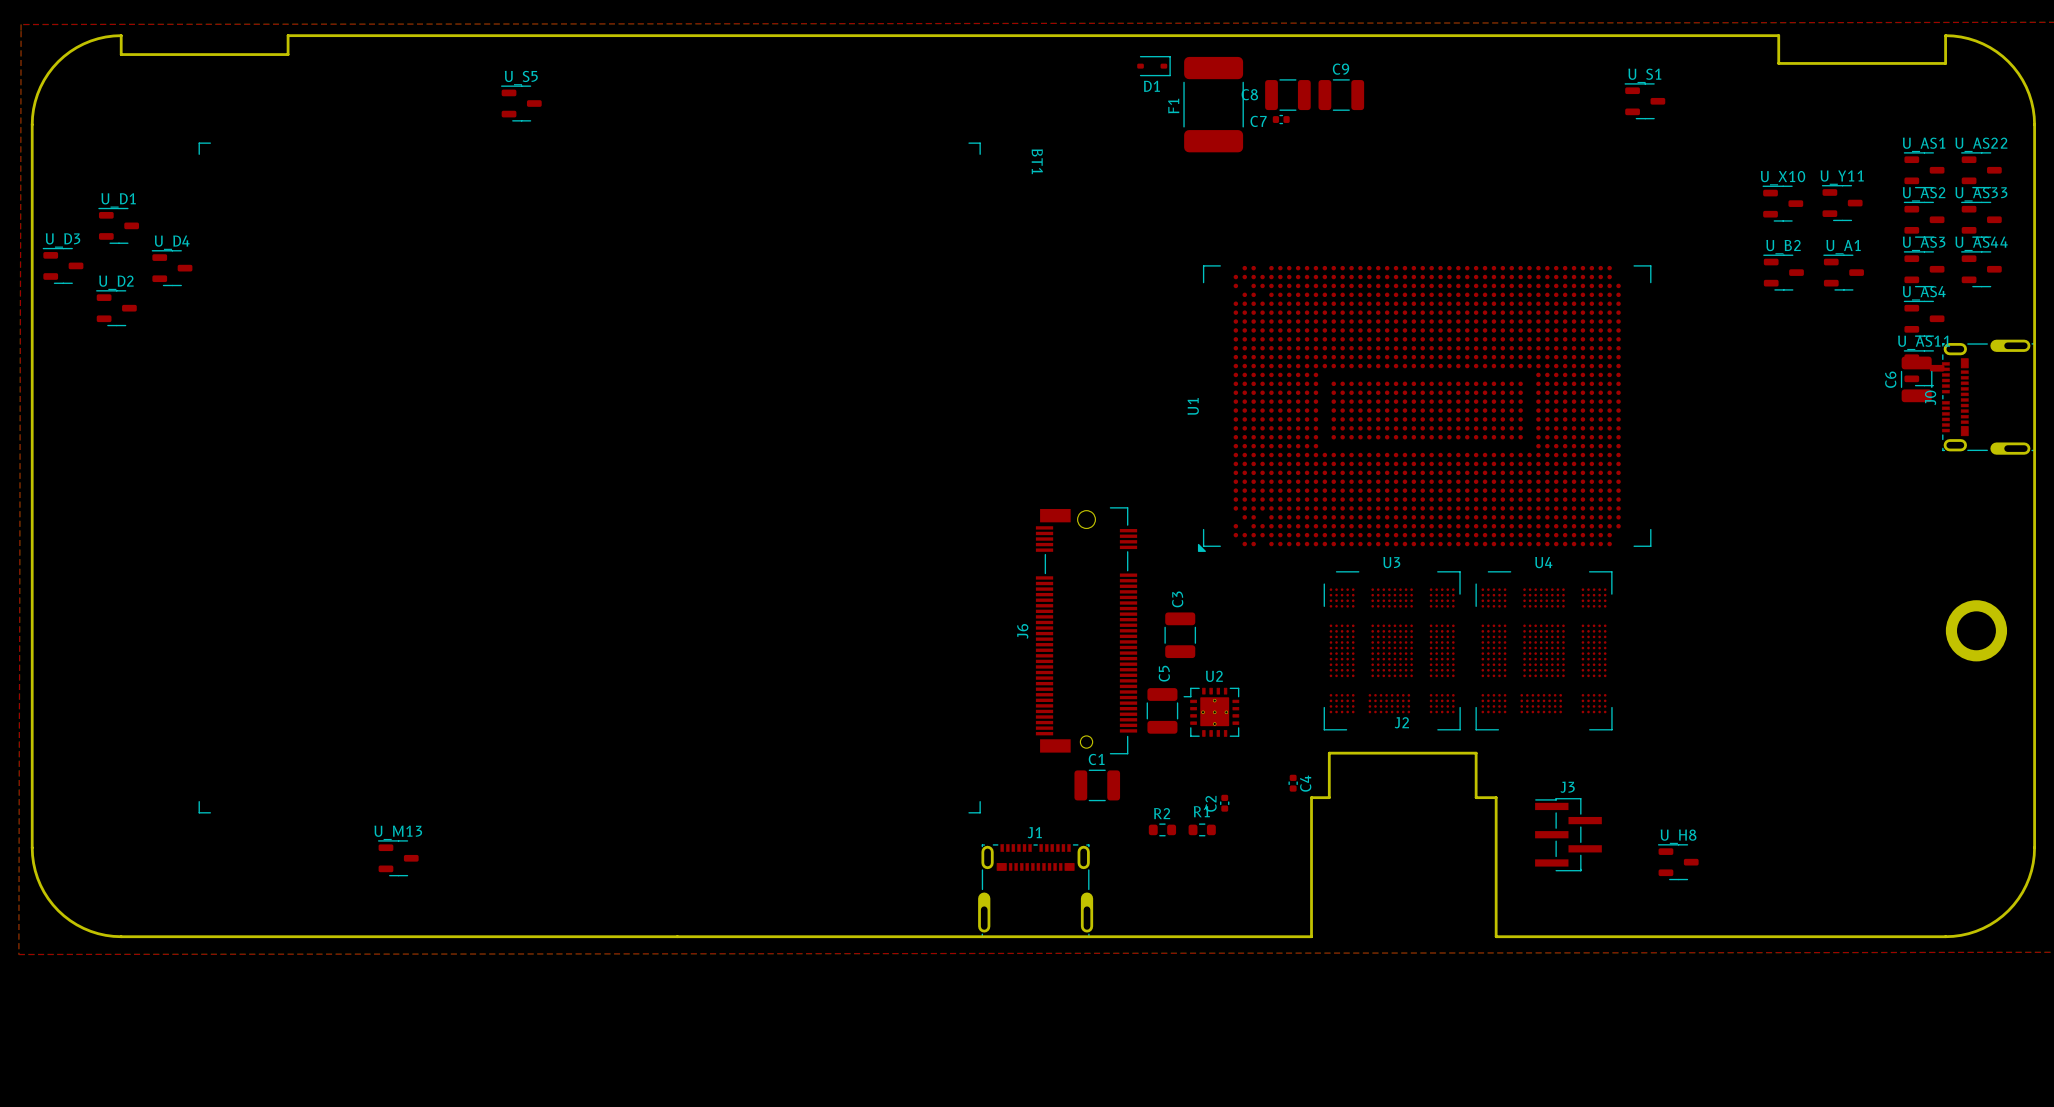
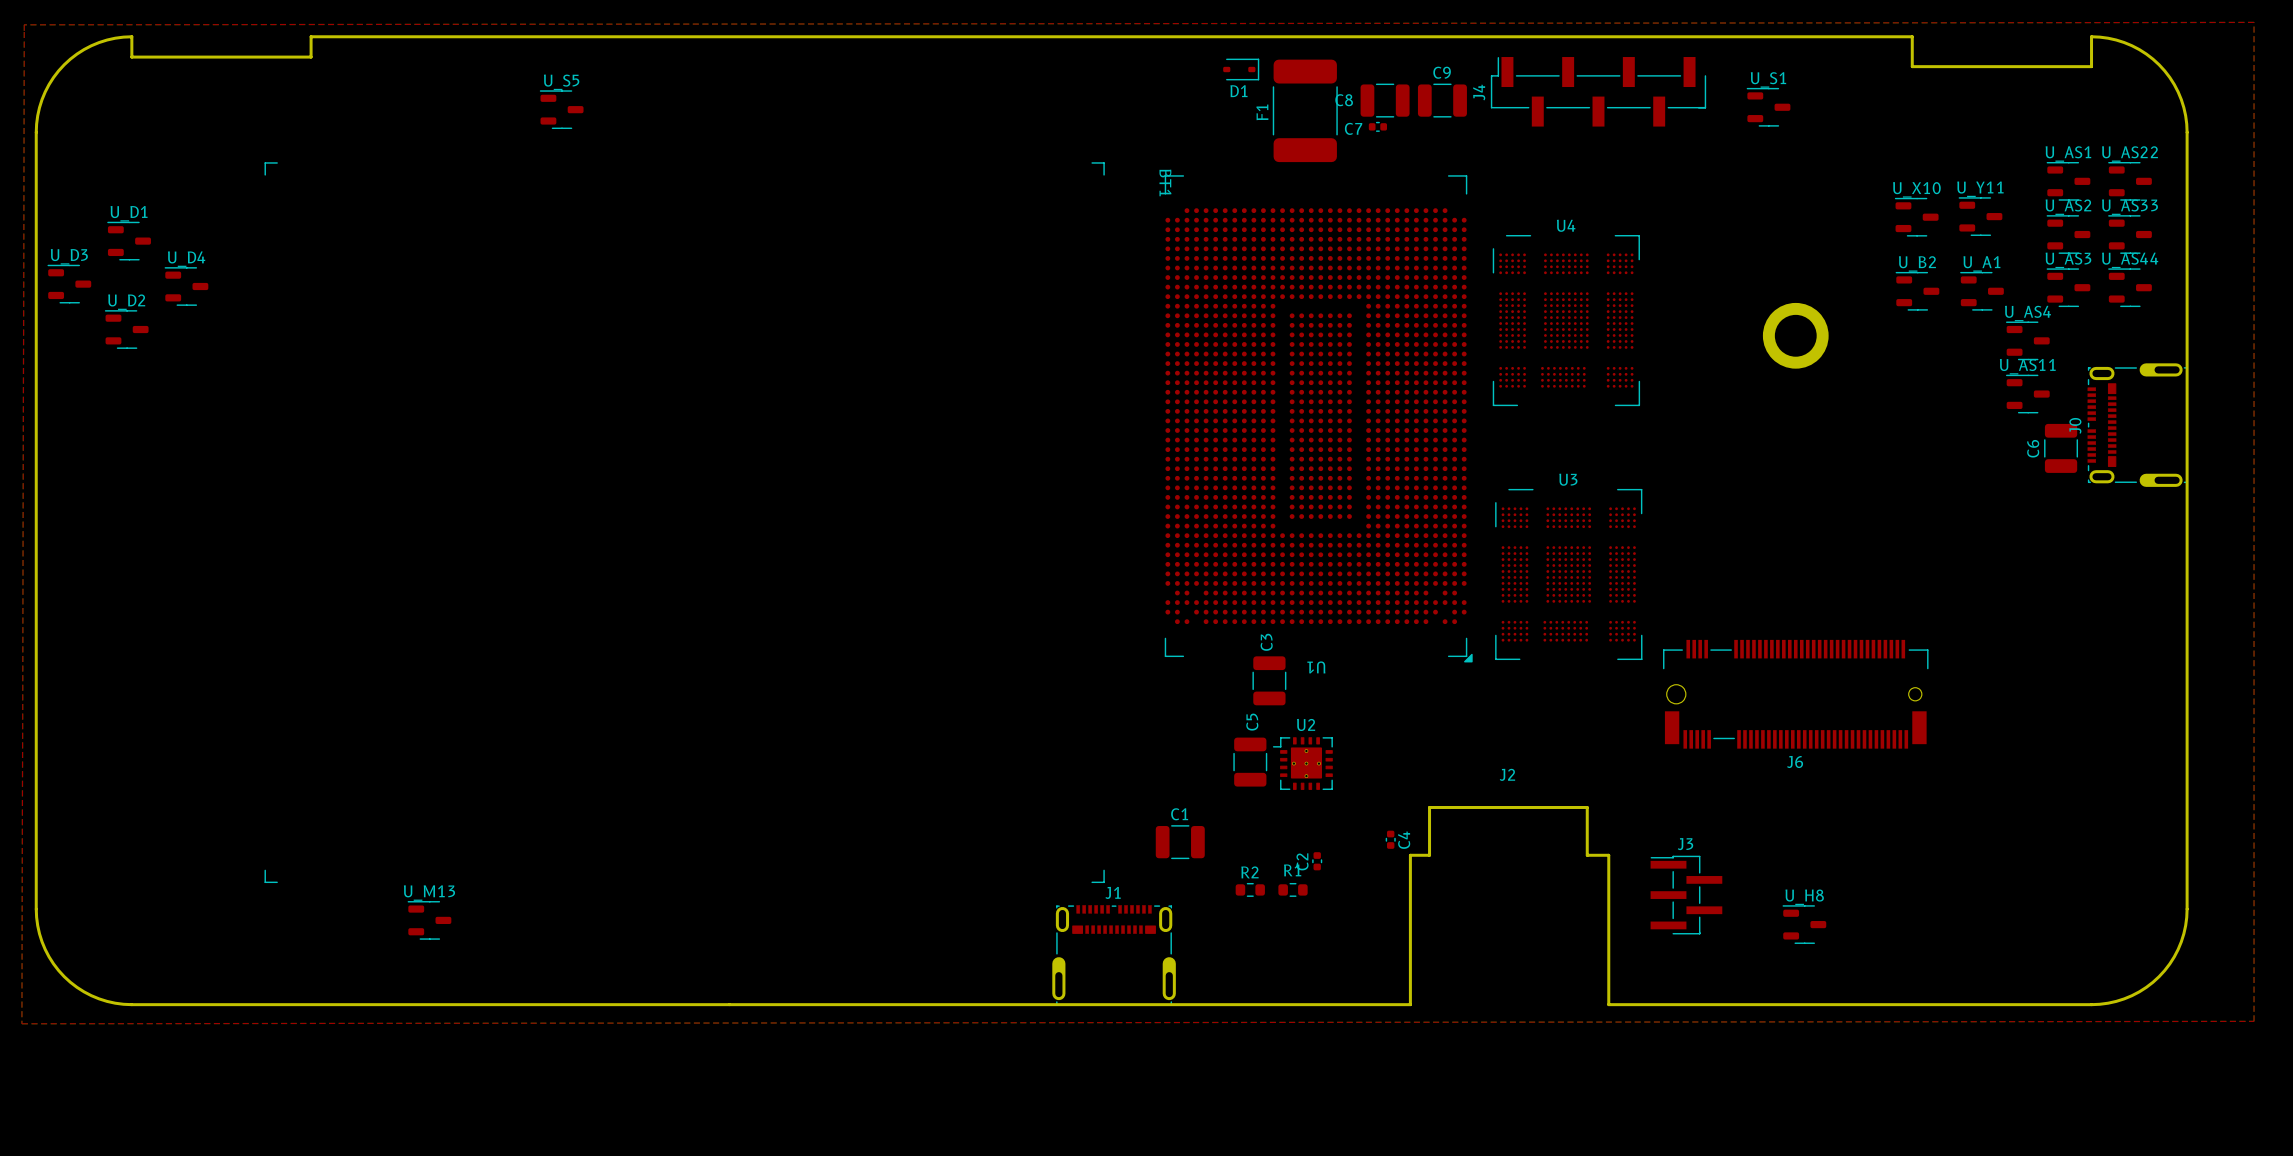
J4: none -> (1598, 91)
U_AS4 position: (1924, 318) -> (2027, 340)
U_AS11 position: (1924, 368) -> (2027, 394)
C6 position: (1916, 379) -> (2061, 448)
U1 rotation: 0° (1424, 408) -> 90° counterclockwise (1318, 418)
BT1 position: (589, 477) -> (684, 522)
J6 footprint: [1035, 507, 2008, 755] -> [1663, 302, 1929, 749]
J6 name position: J6 (1022, 631) -> J6 (1795, 762)
U3 position: (1392, 650) -> (1568, 574)
U4 position: (1544, 650) -> (1566, 320)

